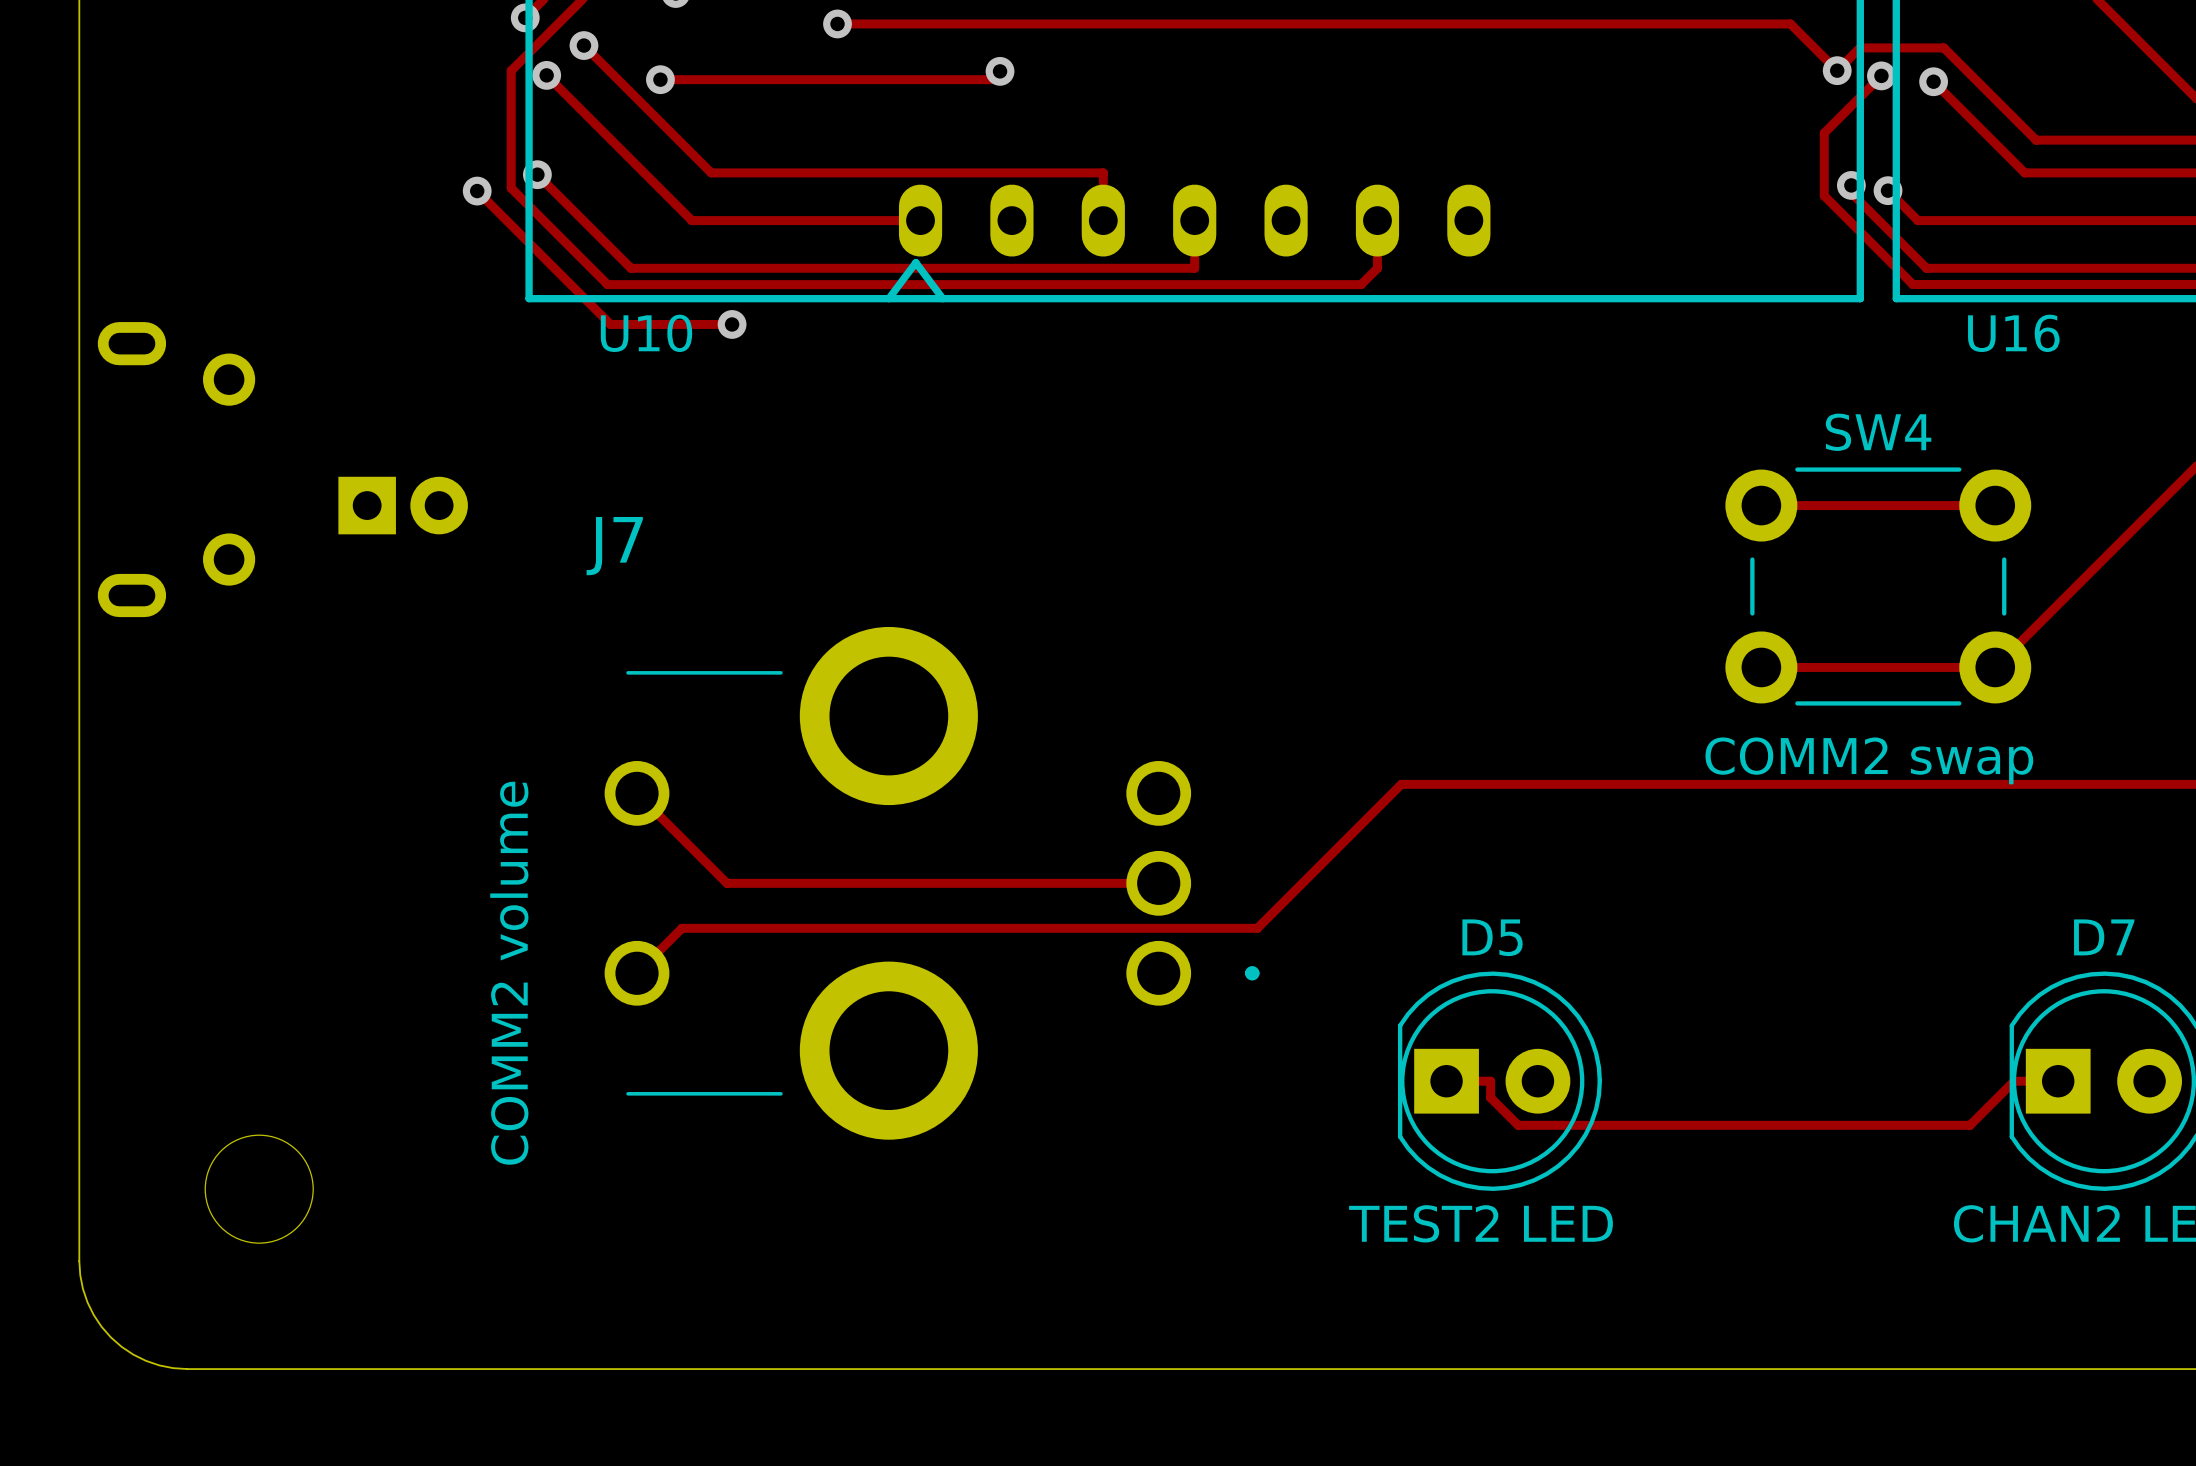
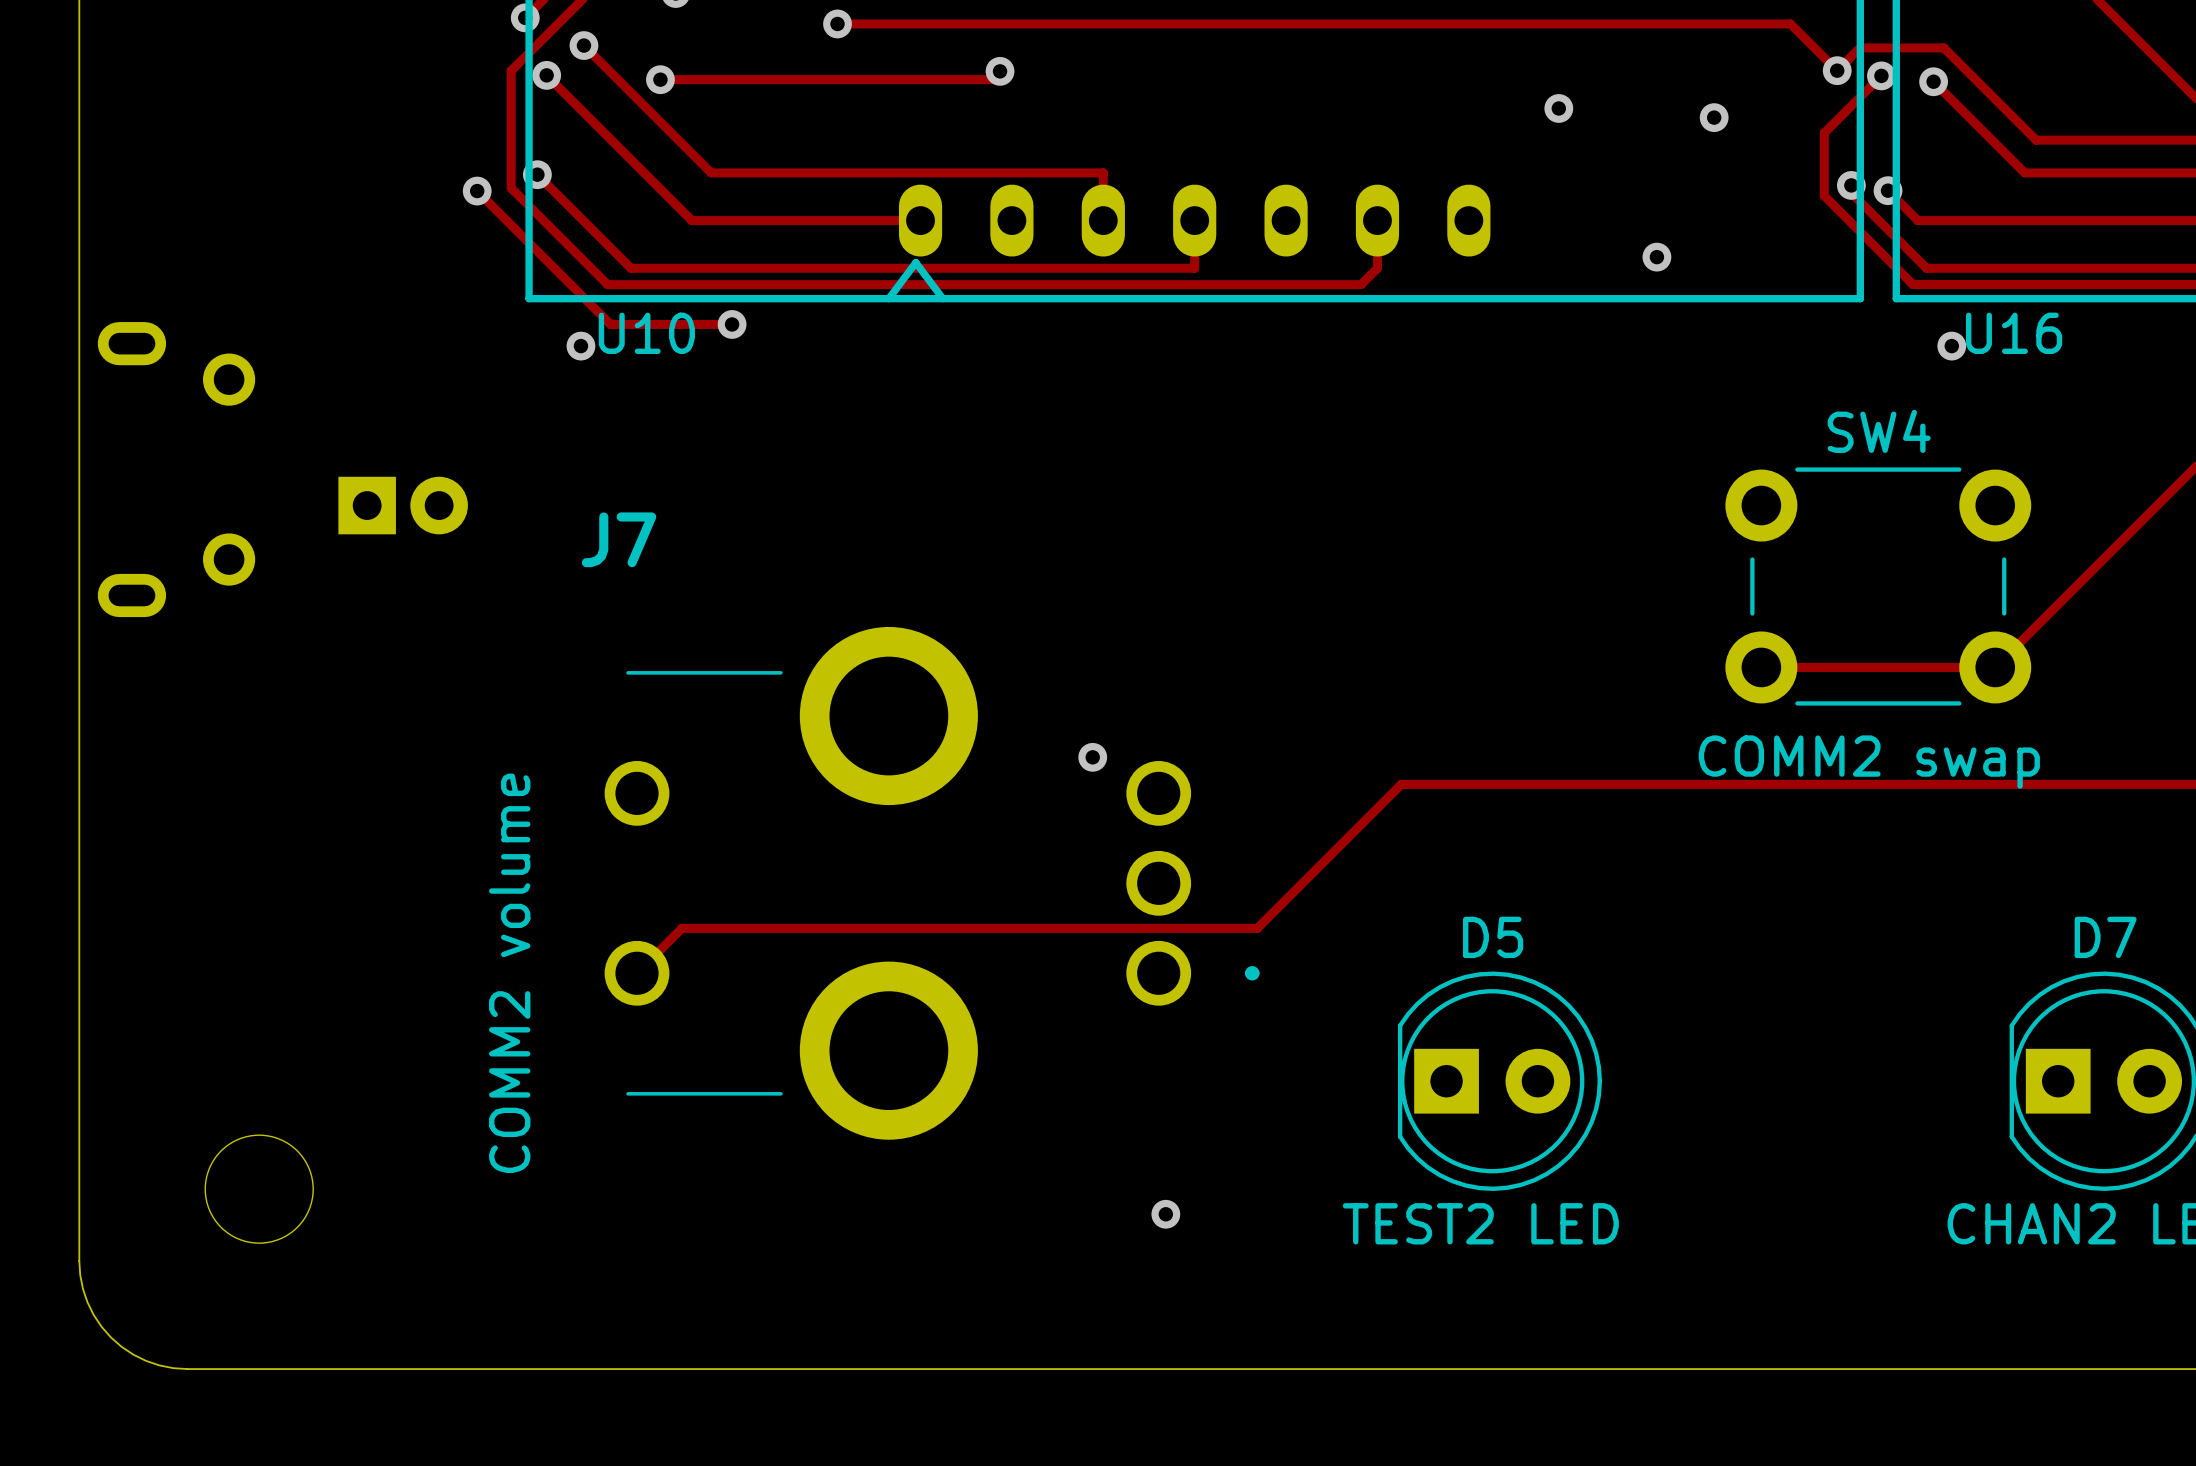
via: none -> (1558, 108)
via: none -> (1714, 117)
via: none -> (1656, 257)
via: none -> (580, 346)
via: none -> (1951, 346)
track: (1761, 505) (1995, 505) -> none
via: none -> (1092, 757)
track: (637, 793) (726, 883) (1158, 883) -> none
track: (1446, 1081) (1490, 1081) (1490, 1097) (1518, 1125) (1970, 1125) (2014, 1081) (2058, 1081) -> none
via: none -> (1165, 1214)

